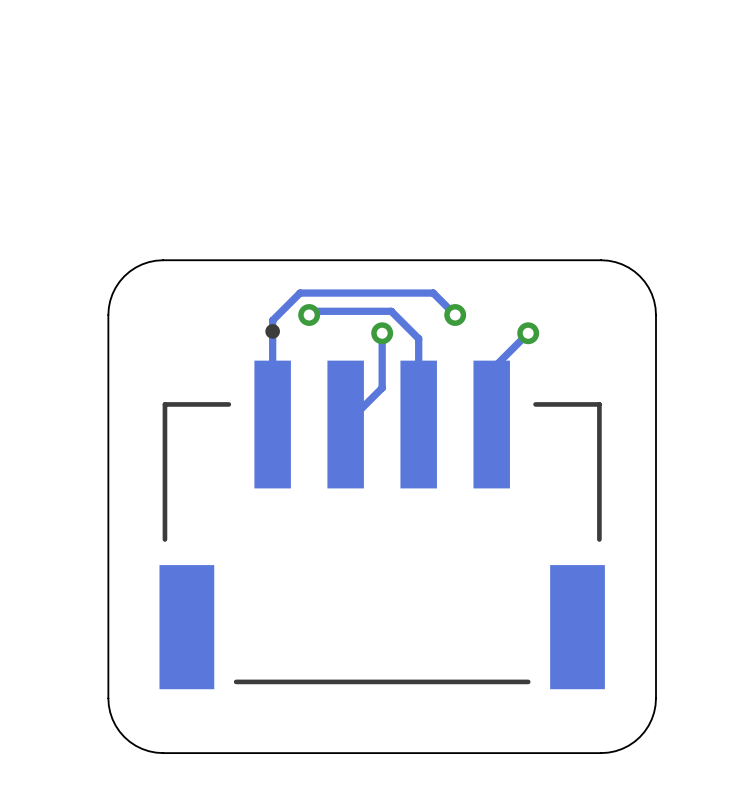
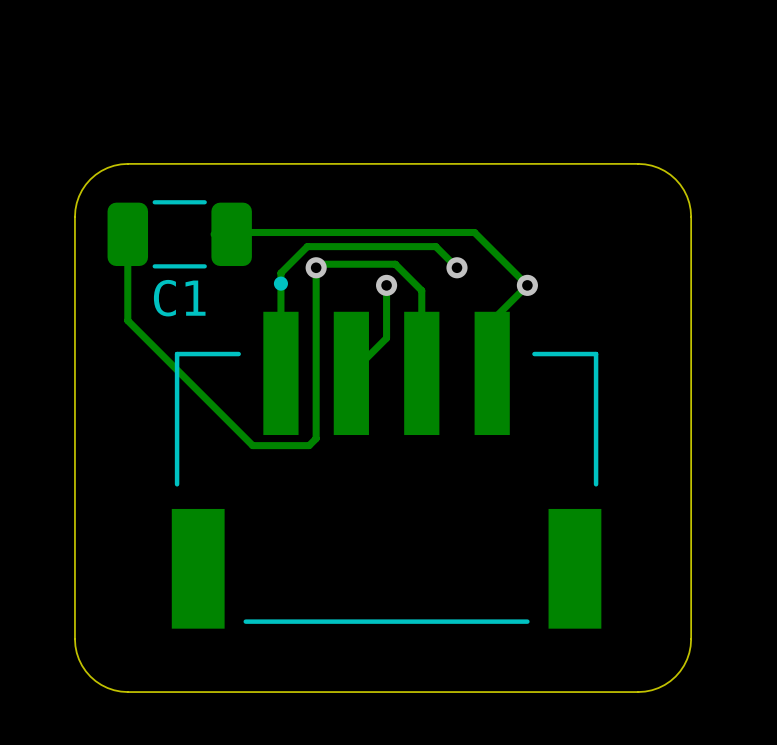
board edge: (601, 260) (163, 260) (142, 264) (124, 276) (112, 294) (108, 315) (108, 698) (112, 719) (124, 737) (142, 748) (163, 753) (601, 753) (622, 748) (639, 737) (651, 719) (655, 698) (655, 307) (648, 287) (634, 271) (615, 262) (601, 260) -> (638, 163) (658, 167) (675, 179) (687, 196) (690, 209) (691, 639) (687, 659) (675, 676) (658, 688) (638, 692) (127, 692) (107, 688) (90, 676) (78, 659) (74, 639) (74, 216) (78, 196) (90, 179) (107, 167) (127, 163) (638, 163)
track: none -> (127, 234) (127, 320) (252, 445) (309, 445) (316, 438) (316, 267)
C1: none -> (179, 234)
track: none -> (214, 234) (215, 232) (474, 232) (527, 285)

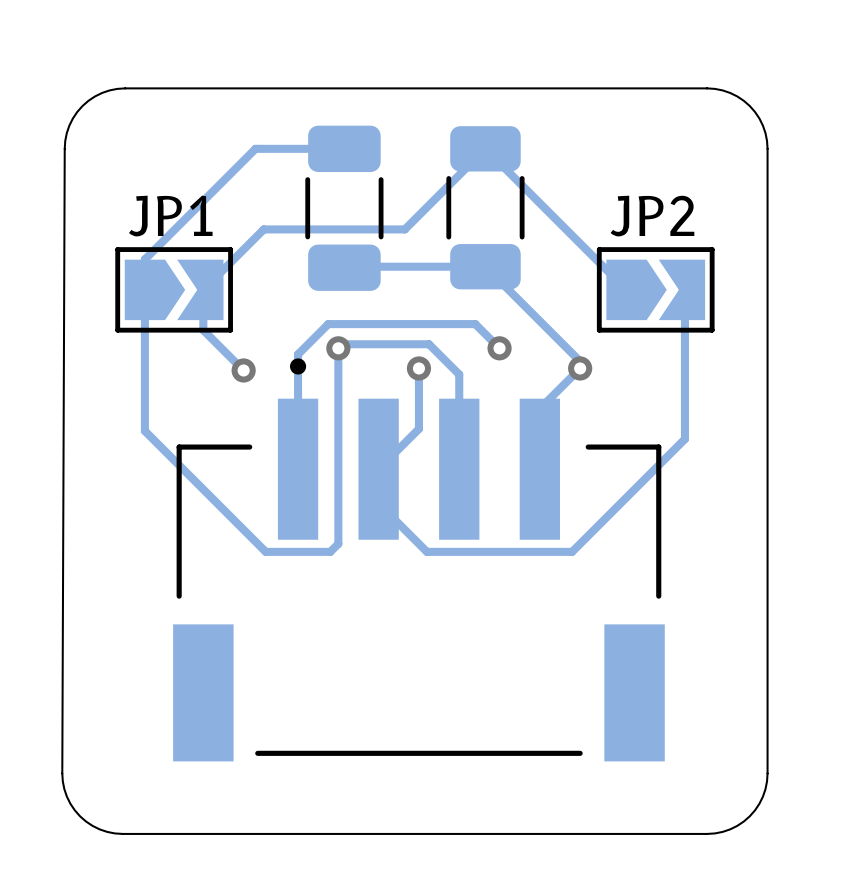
part: none -> (485, 207)
part: none -> (344, 208)
JP1: none -> (174, 289)
track: none -> (626, 289) (485, 148) (404, 229) (263, 229) (203, 289) (203, 330) (243, 370)
JP2: none -> (655, 289)
track: none -> (684, 289) (684, 439) (572, 551) (426, 551) (378, 503) (378, 469)
board edge: (691, 216) (689, 203) (680, 184) (664, 170) (645, 164) (127, 163) (114, 165) (95, 174) (82, 190) (76, 203) (74, 216) (74, 639) -> (767, 289) (767, 148) (765, 133) (759, 118) (749, 106) (737, 96) (722, 90) (707, 88) (125, 88) (102, 92) (88, 100) (72, 118) (66, 133) (64, 148) (62, 773)
track: (127, 234) (127, 320) (147, 340) -> (344, 148) (255, 148) (144, 259) (144, 431)
C1: (179, 234) -> none
track: (214, 234) (215, 232) (474, 232) (527, 285) -> (344, 267) (485, 266) (580, 361) (580, 368)
via: none -> (243, 370)

